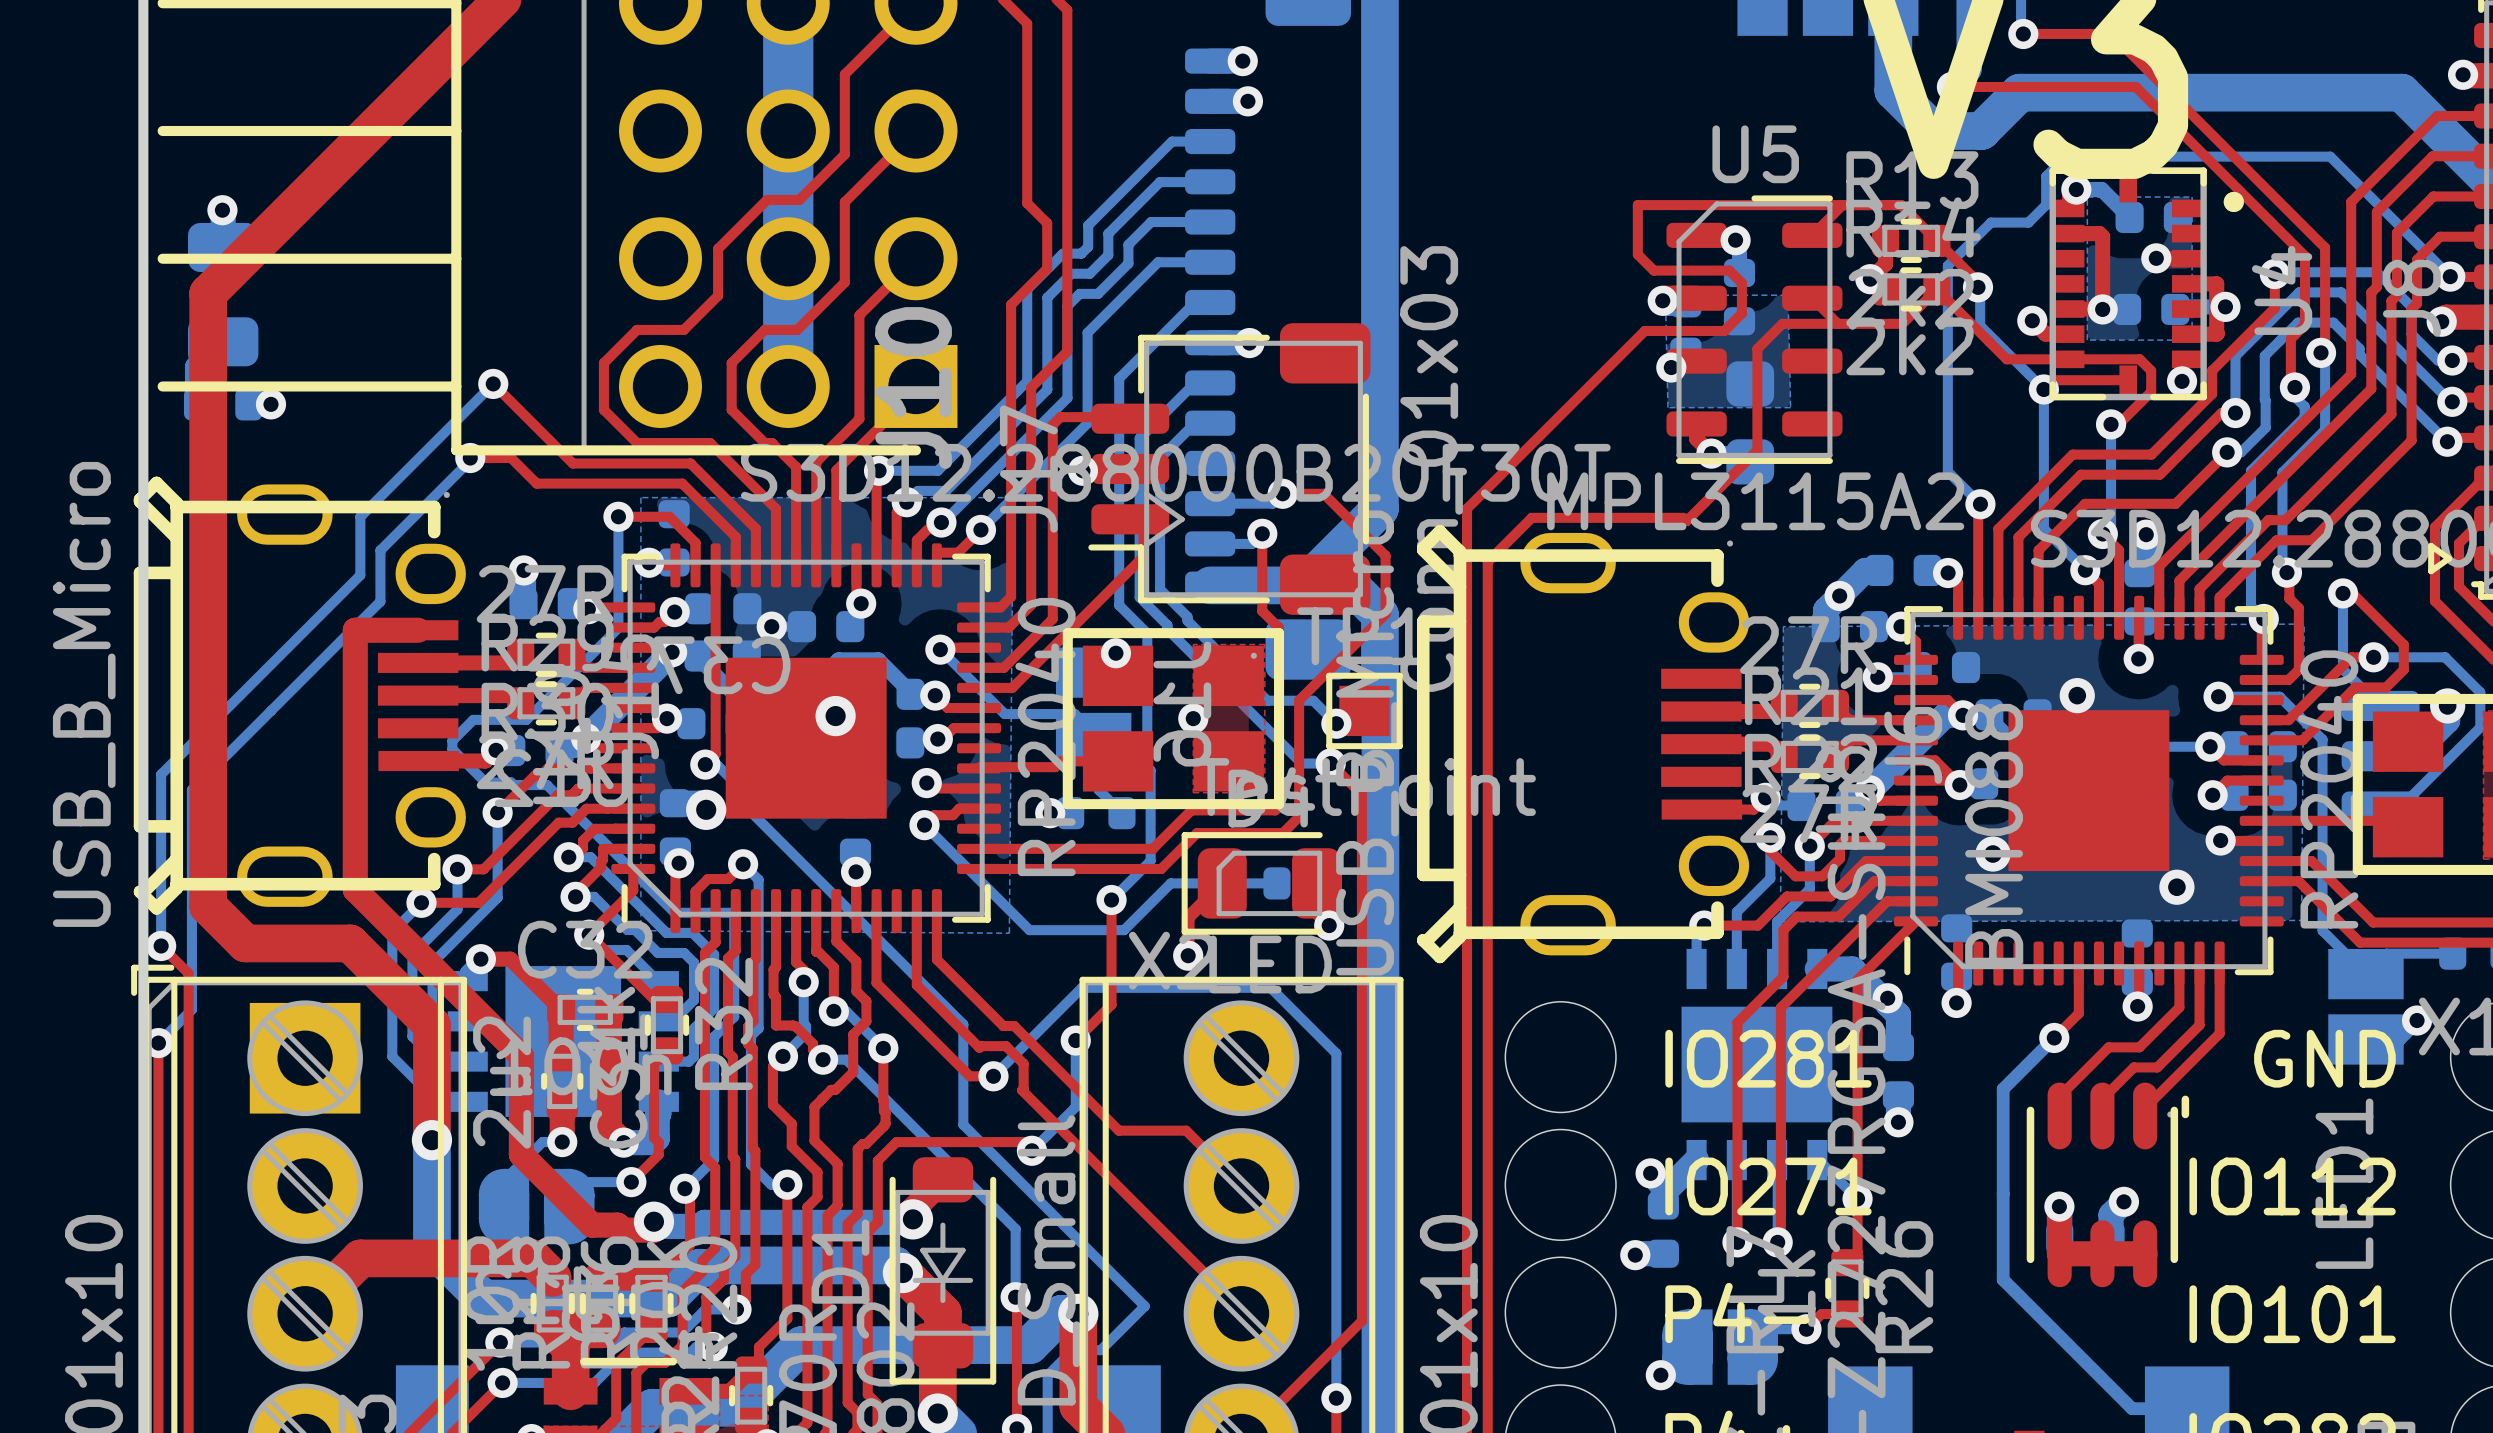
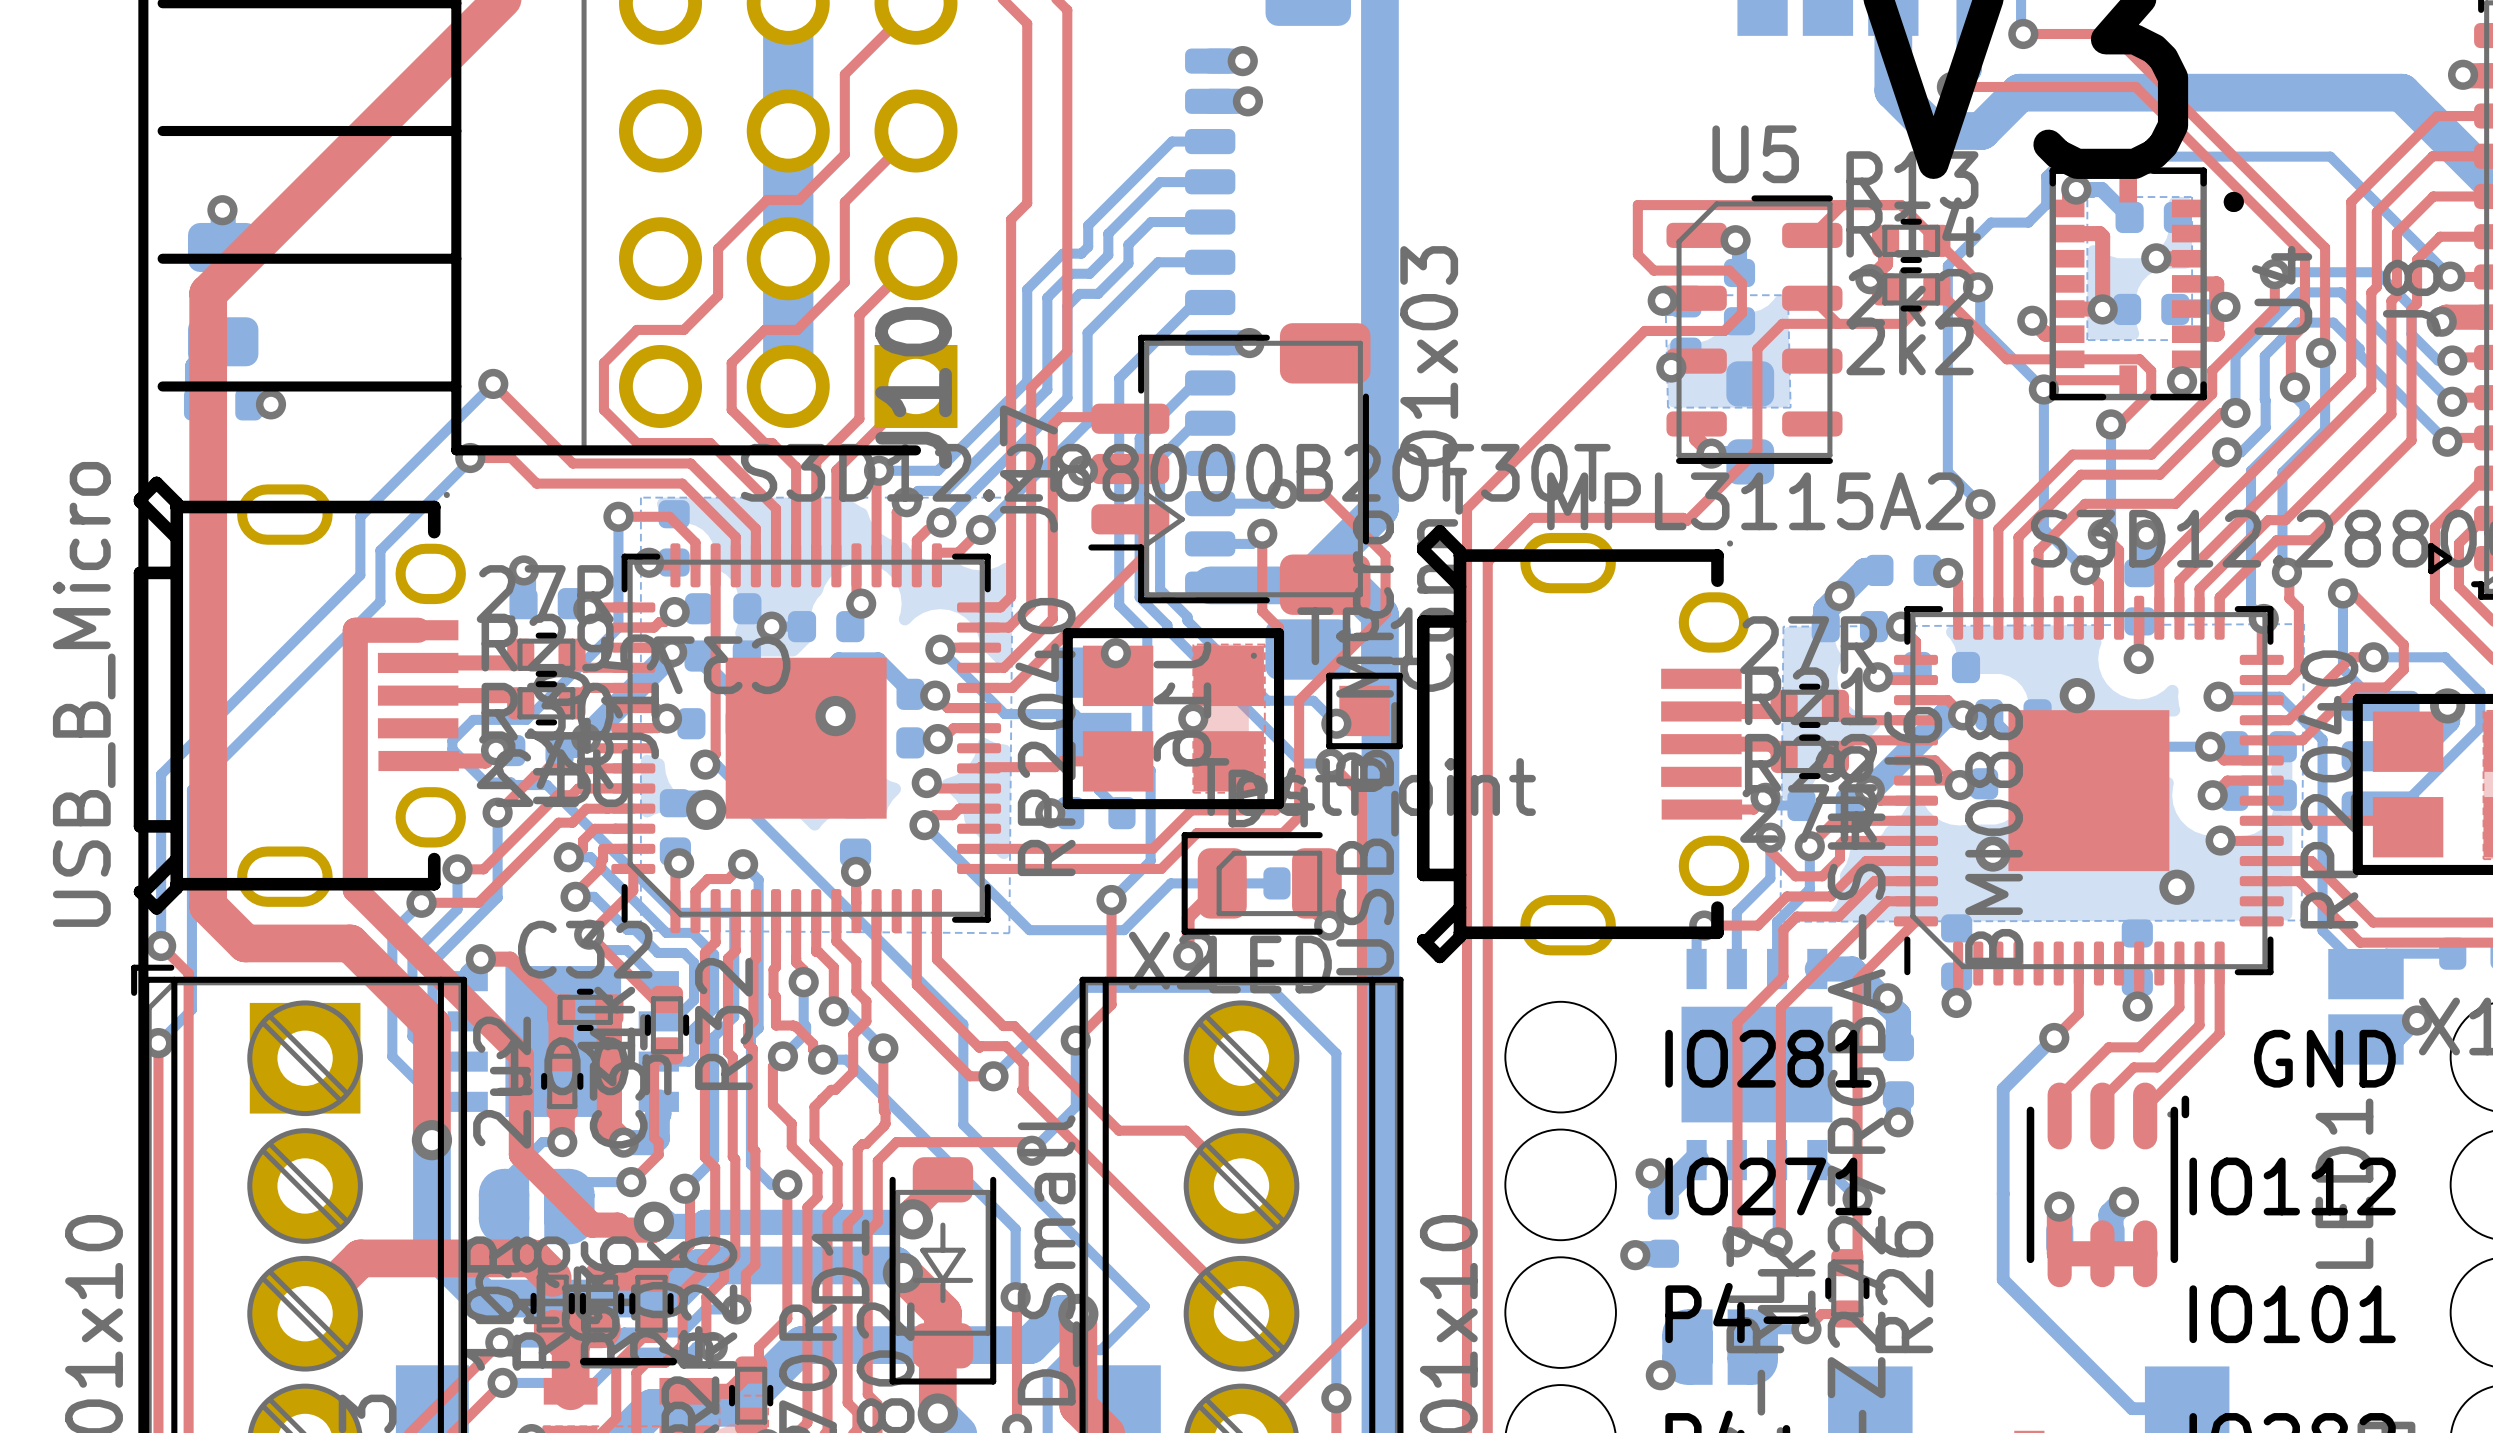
top track: (1027, 203) (1047, 223) (1047, 268) (1011, 304) -> (1027, 203) (1011, 219) (1011, 304)

